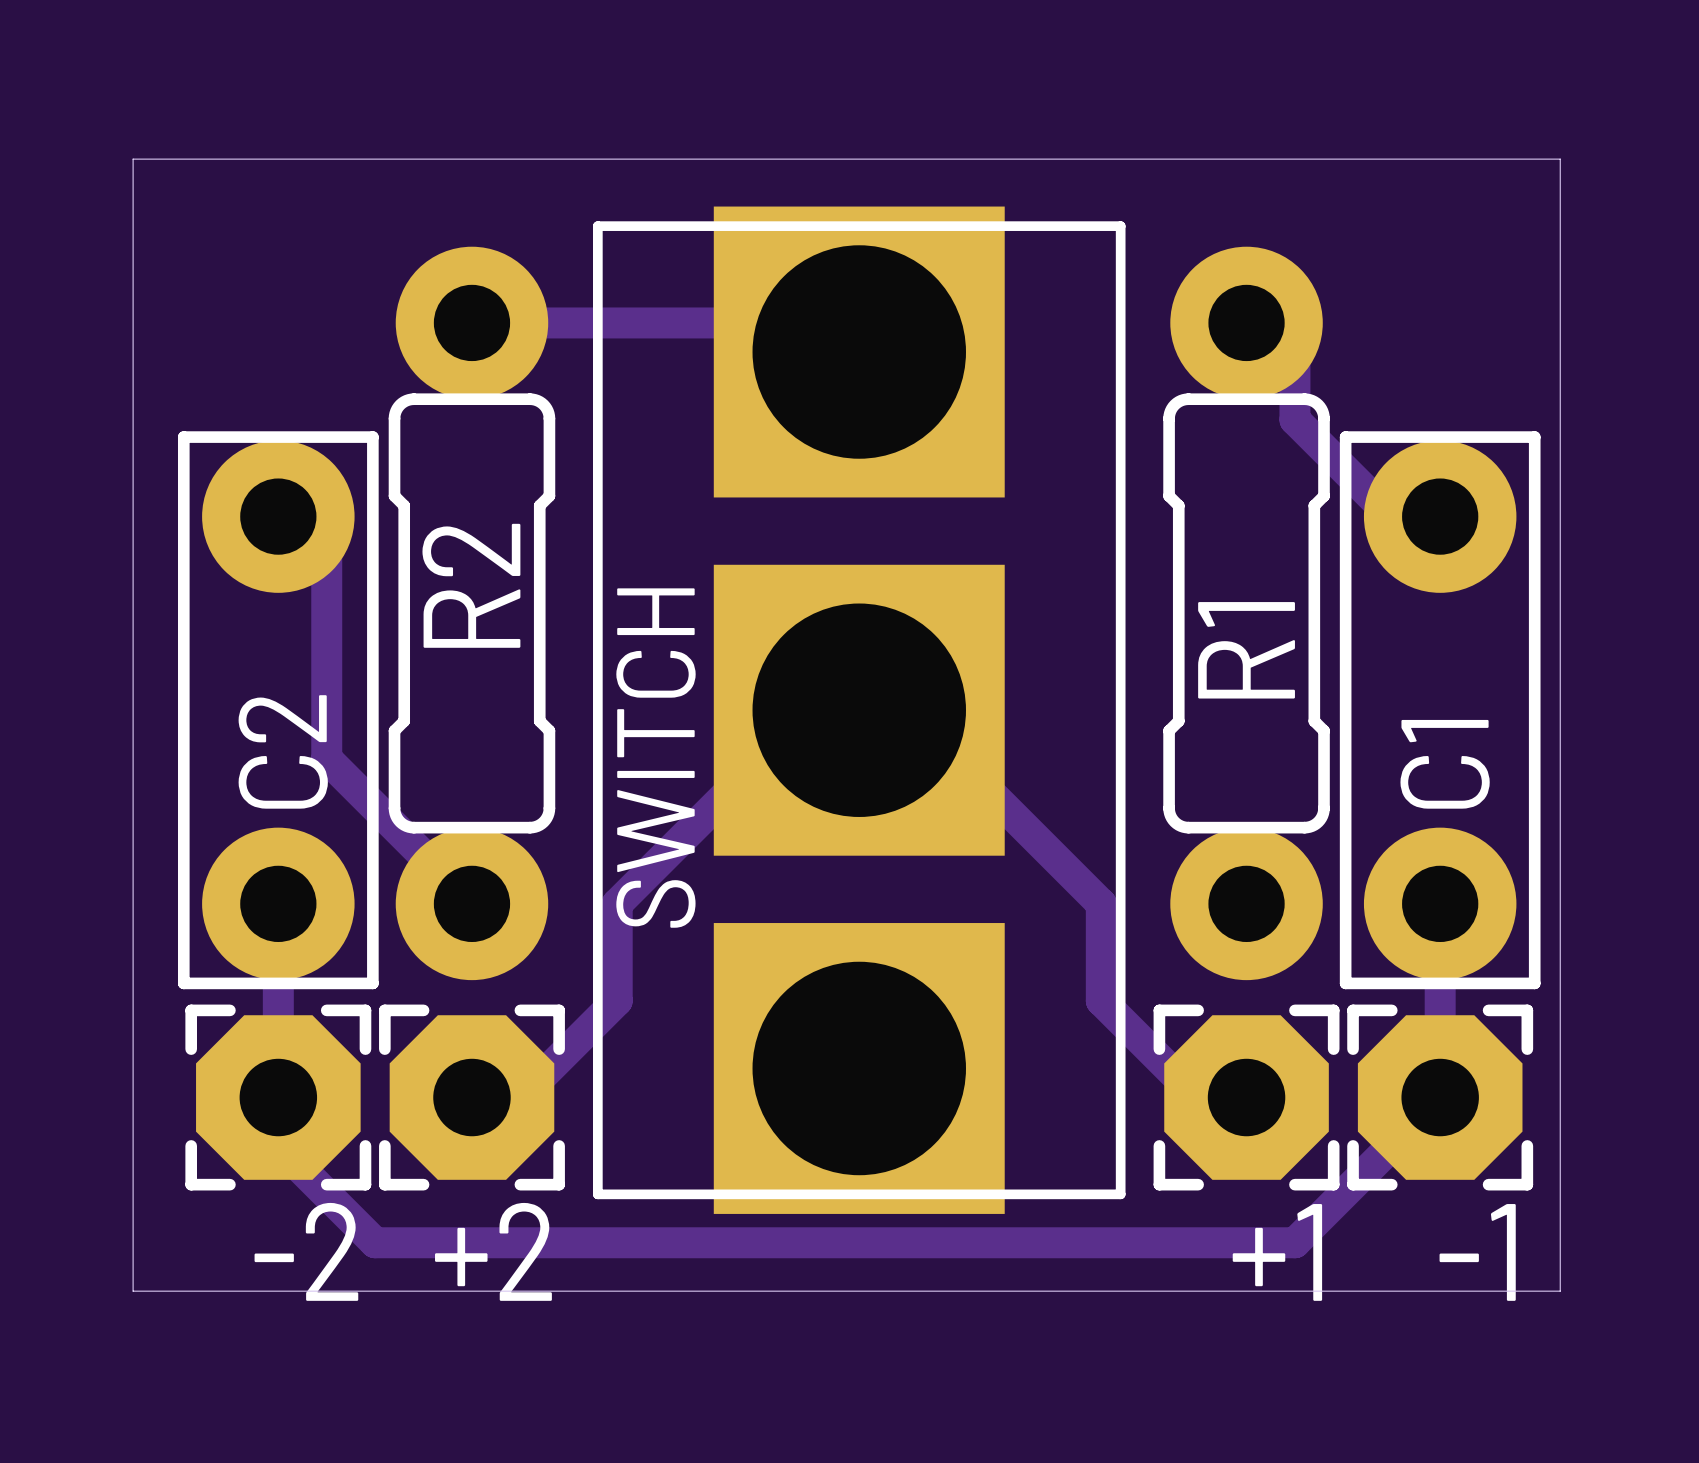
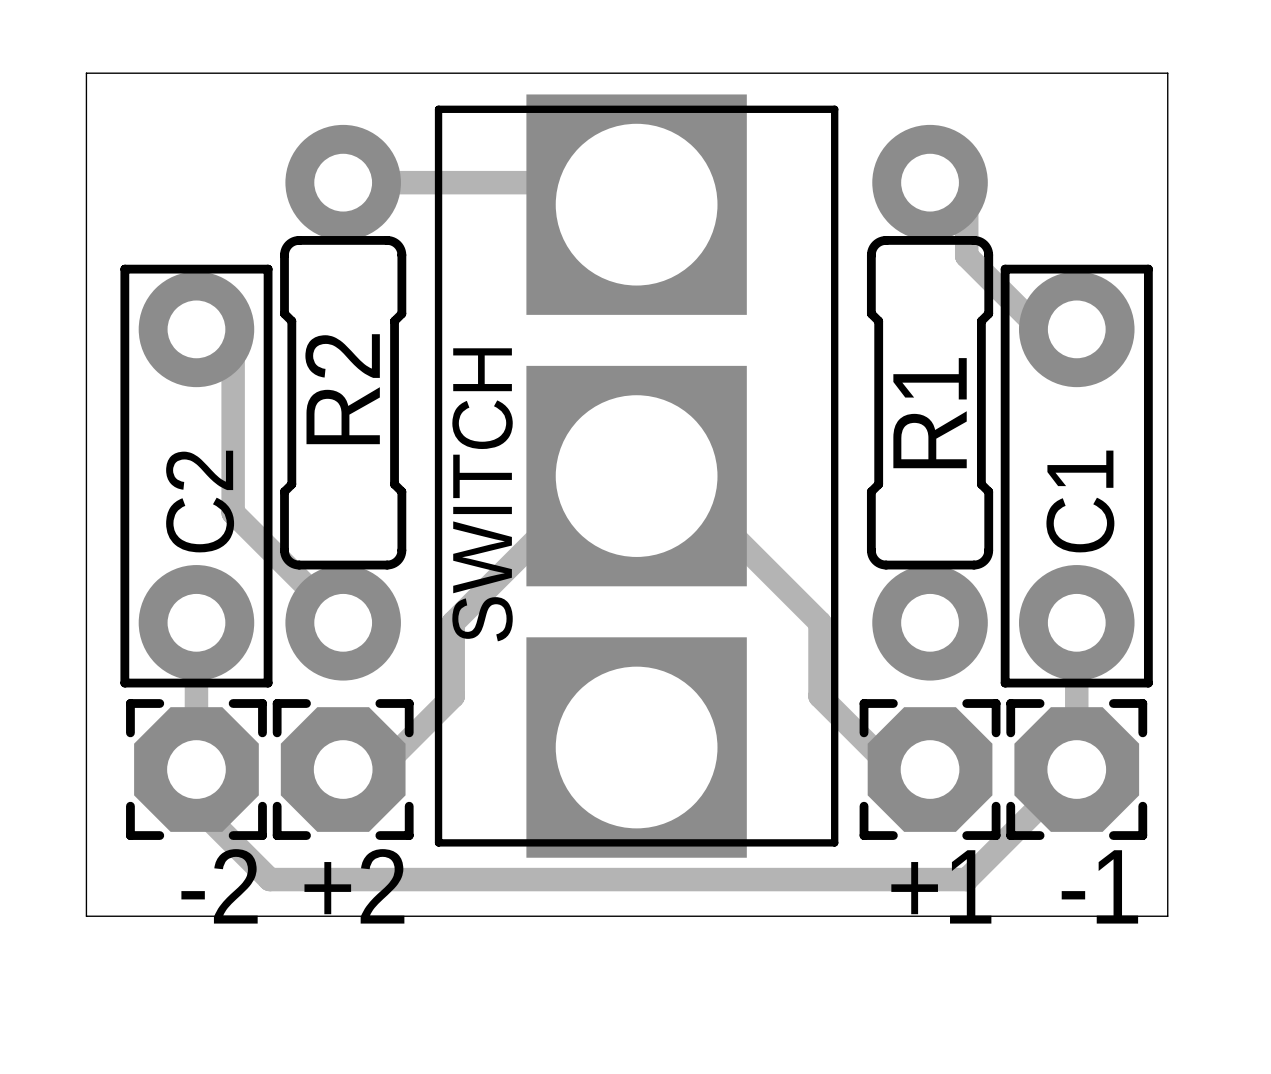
board edge: (133, 178) (133, 159) (1560, 159) (1560, 178) -> (86, 73) (1167, 73)

